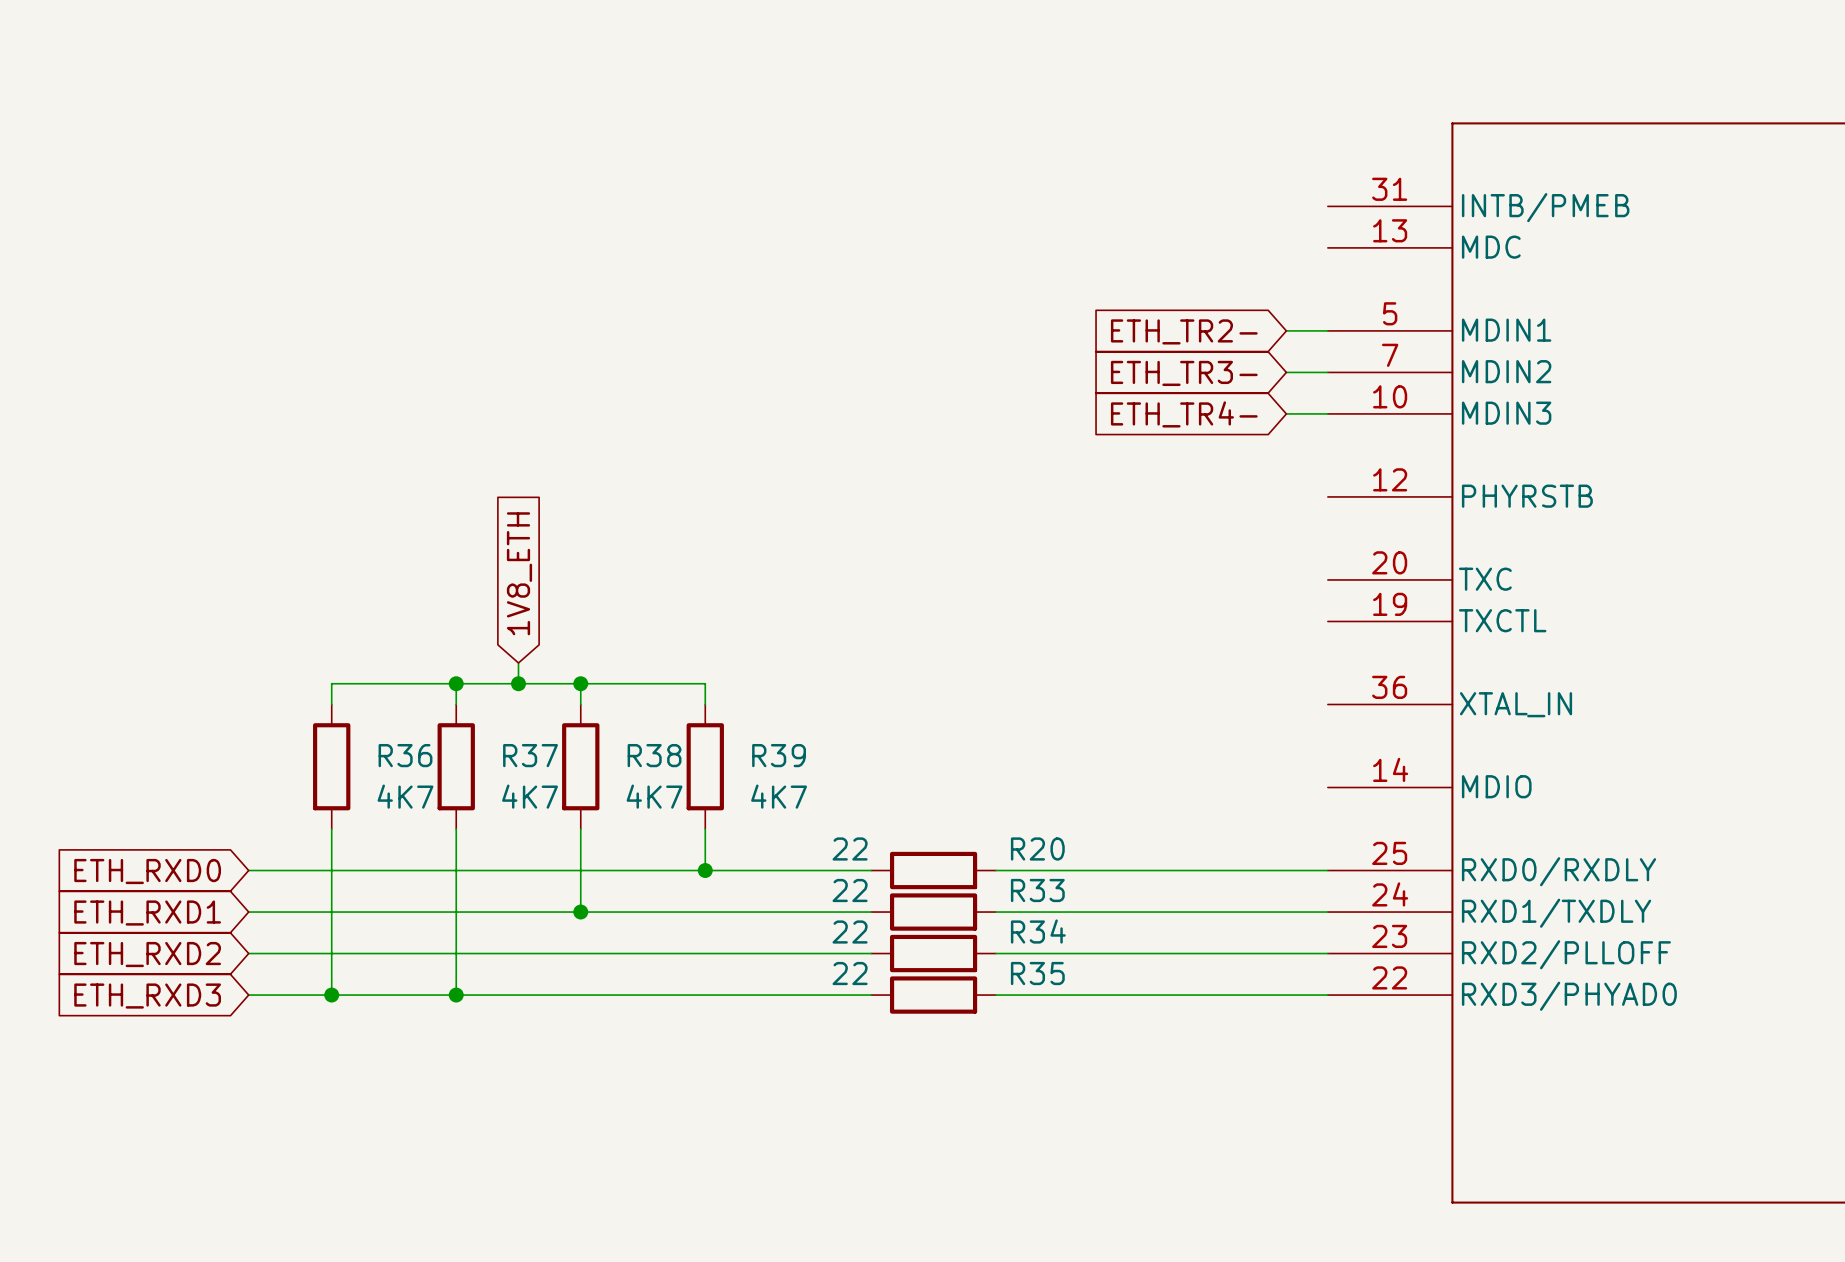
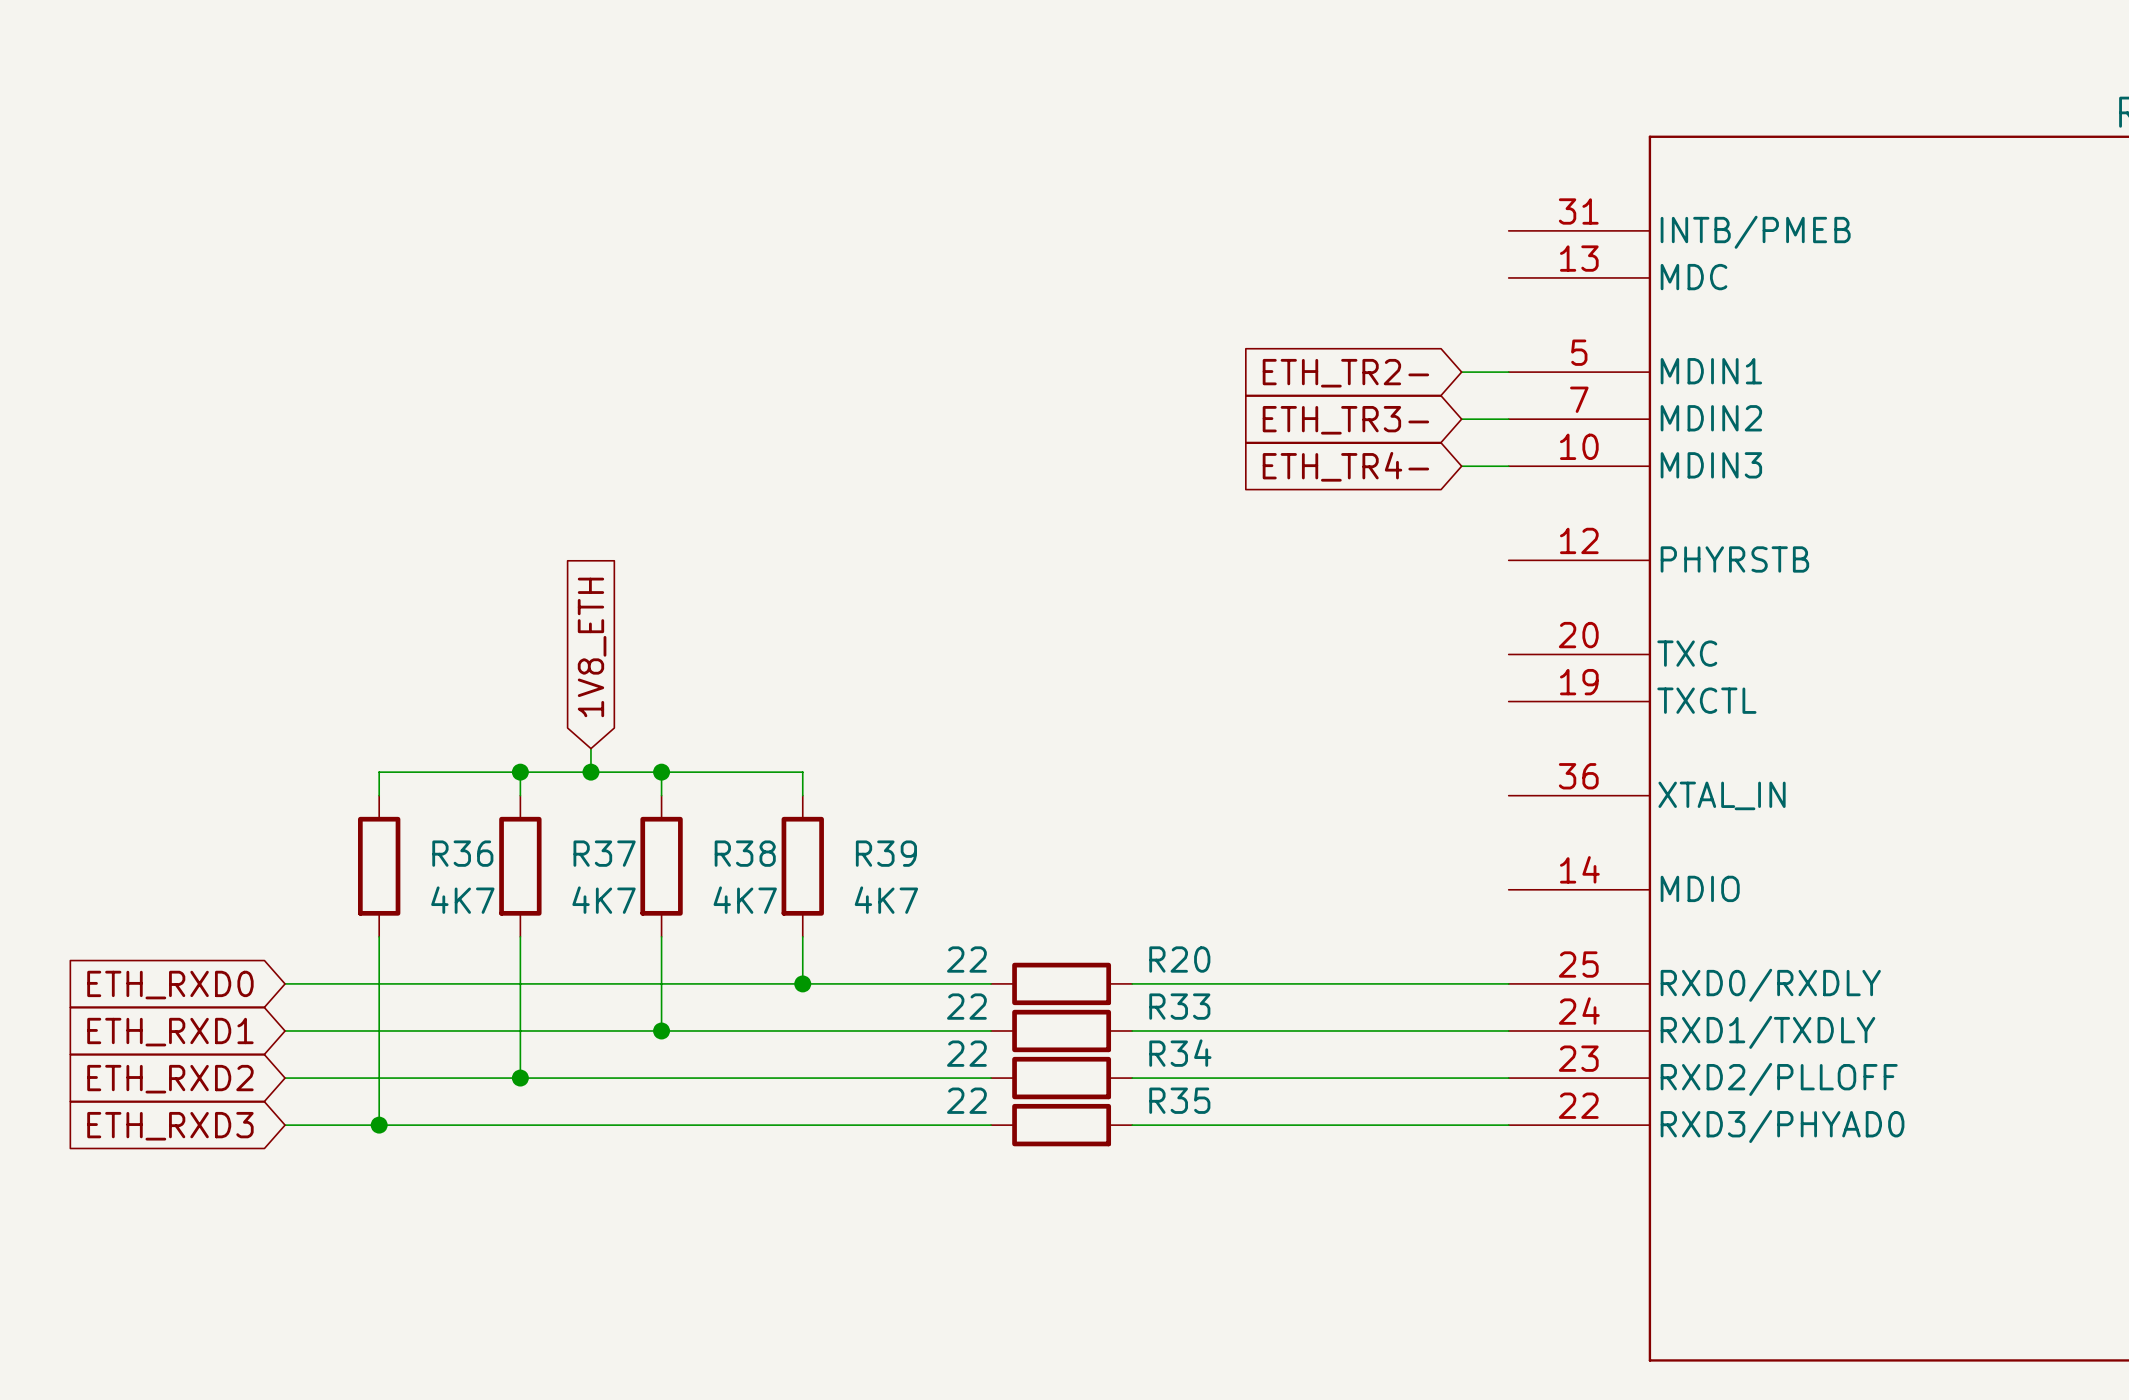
wire: (456, 953) (456, 995) -> none
junction position: (456, 995) -> (520, 1078)

